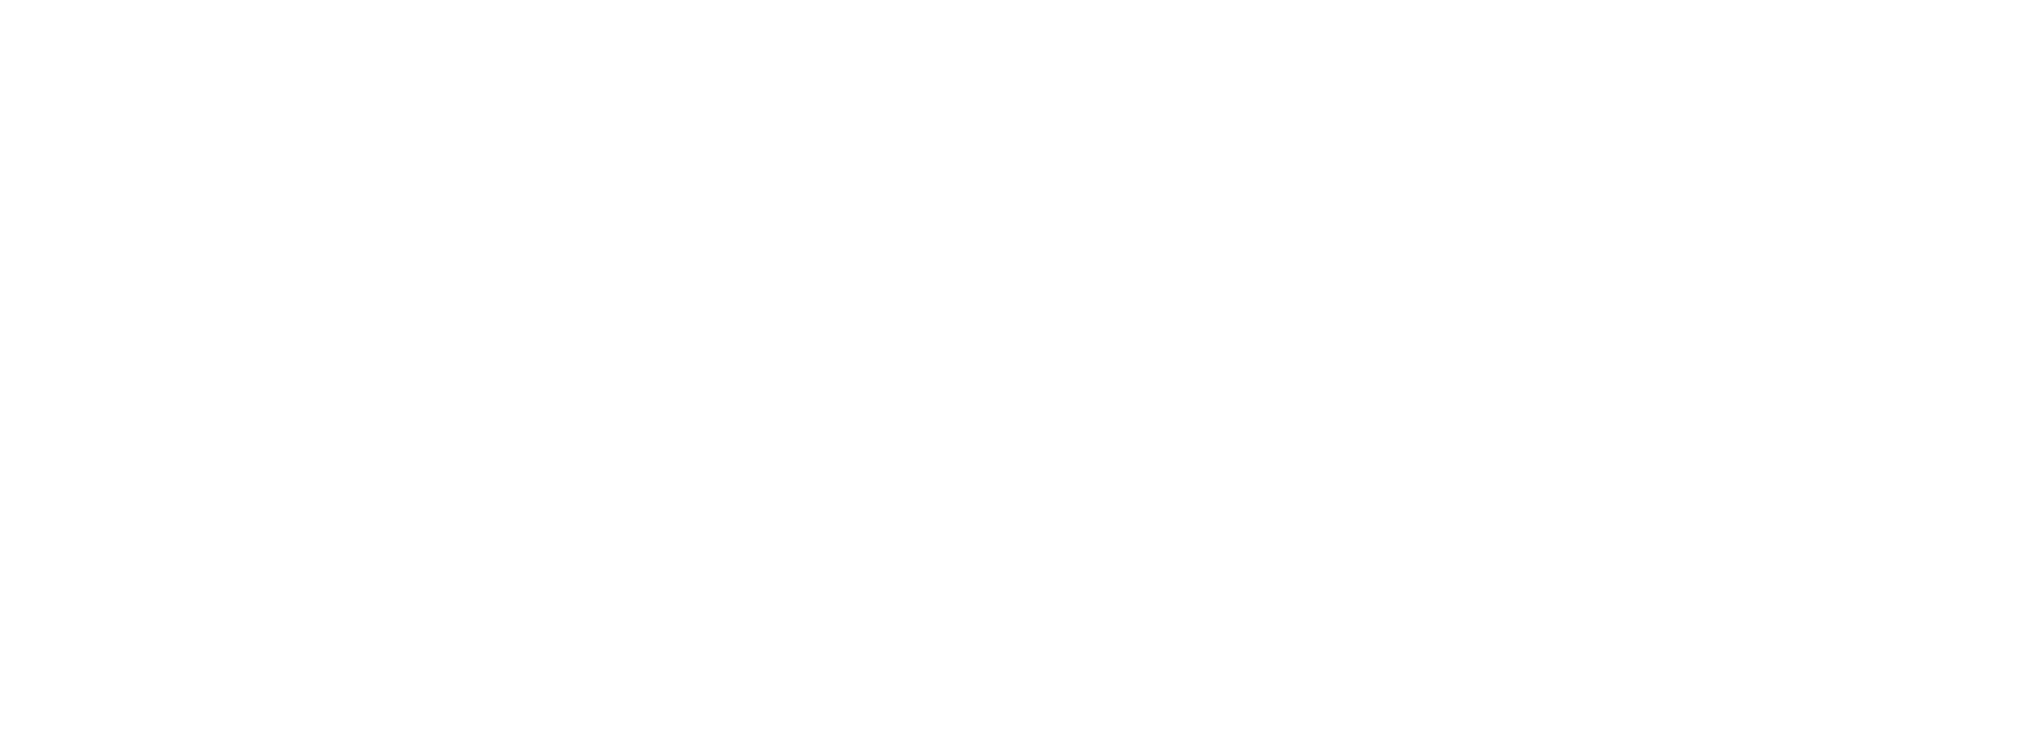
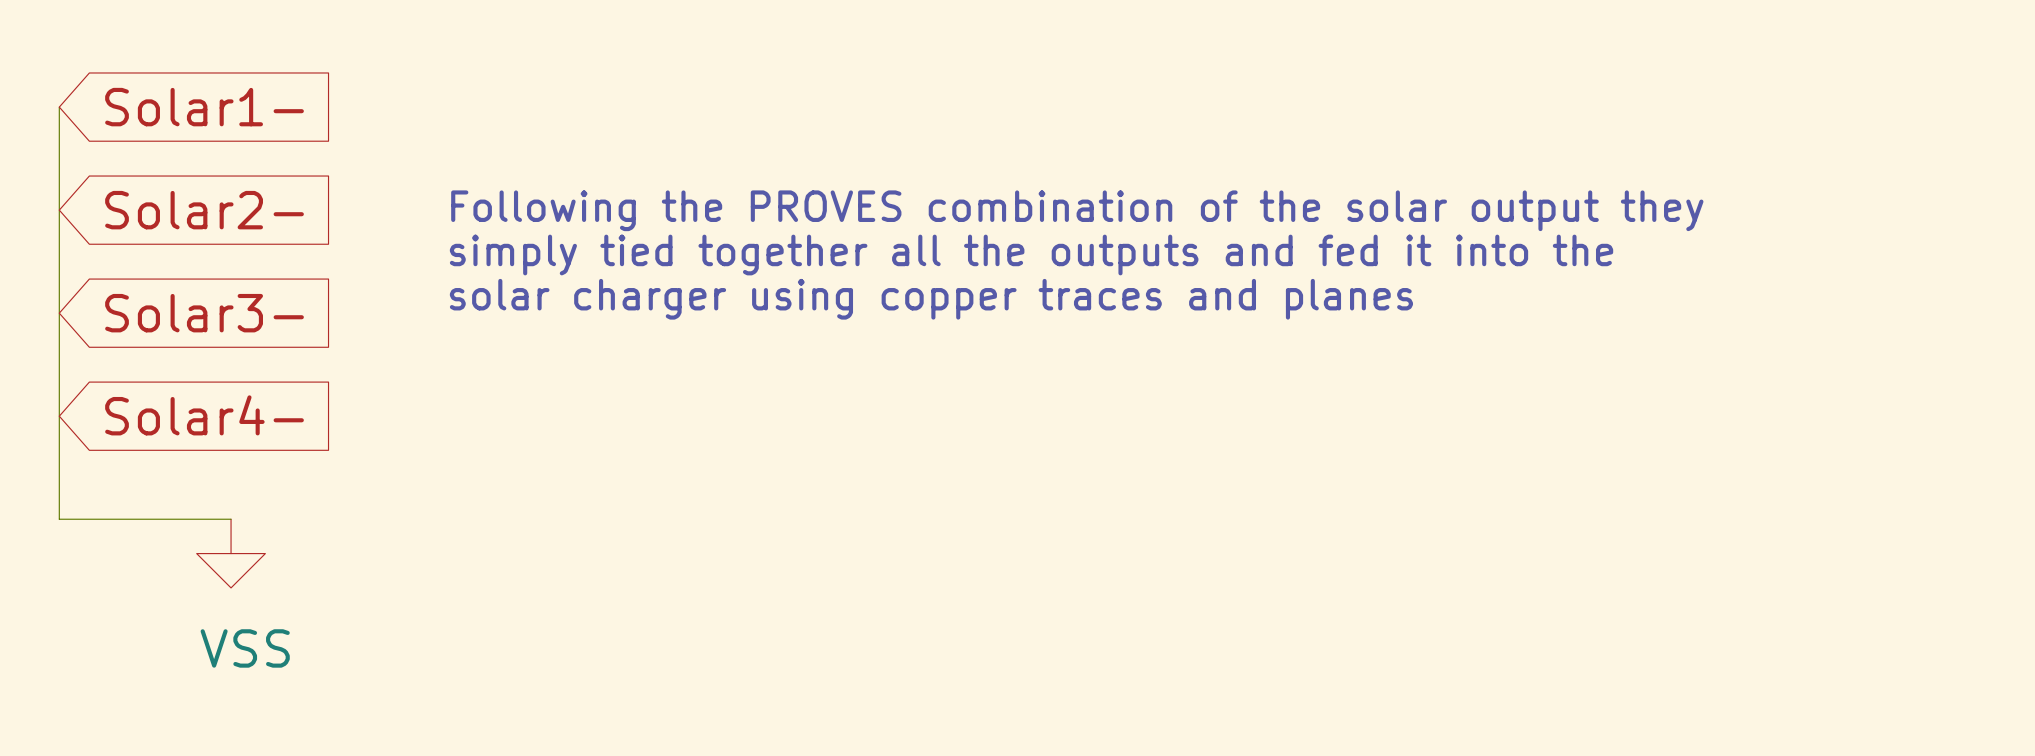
wire: none -> (59, 107) (59, 519) (231, 519)
global label: none -> Solar1- (204, 107)
global label: none -> Solar2- (204, 210)
text: none -> Following the PROVES combination of the solar output they (1077, 210)
text: none -> simply tied together all the outputs and fed it into the (1031, 255)
text: none -> solar charger using copper traces and planes (931, 299)
global label: none -> Solar3- (204, 313)
global label: none -> Solar4- (204, 415)
power symbol: none -> VSS (231, 553)

